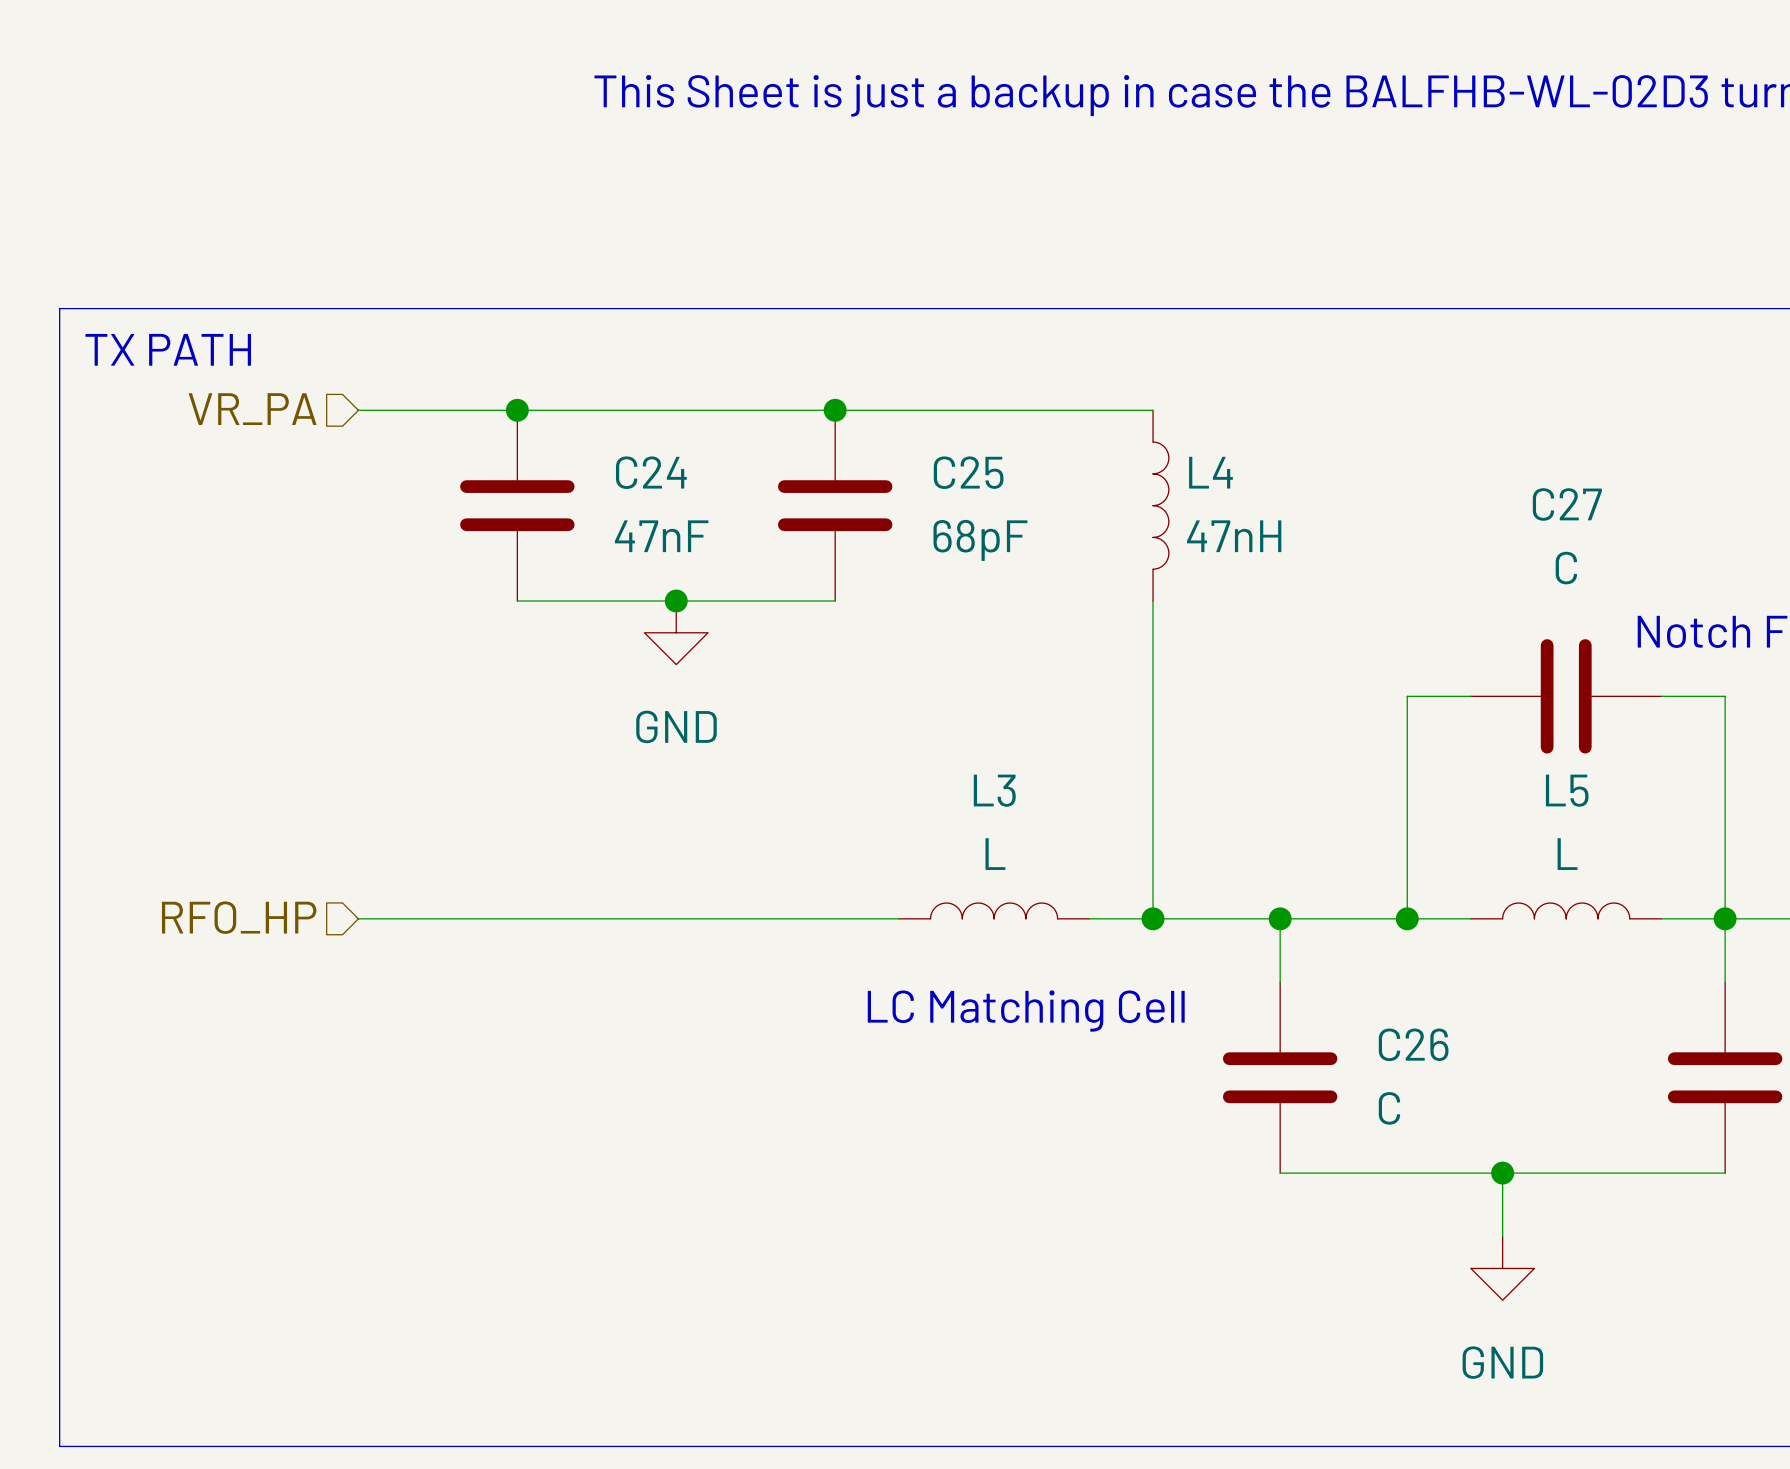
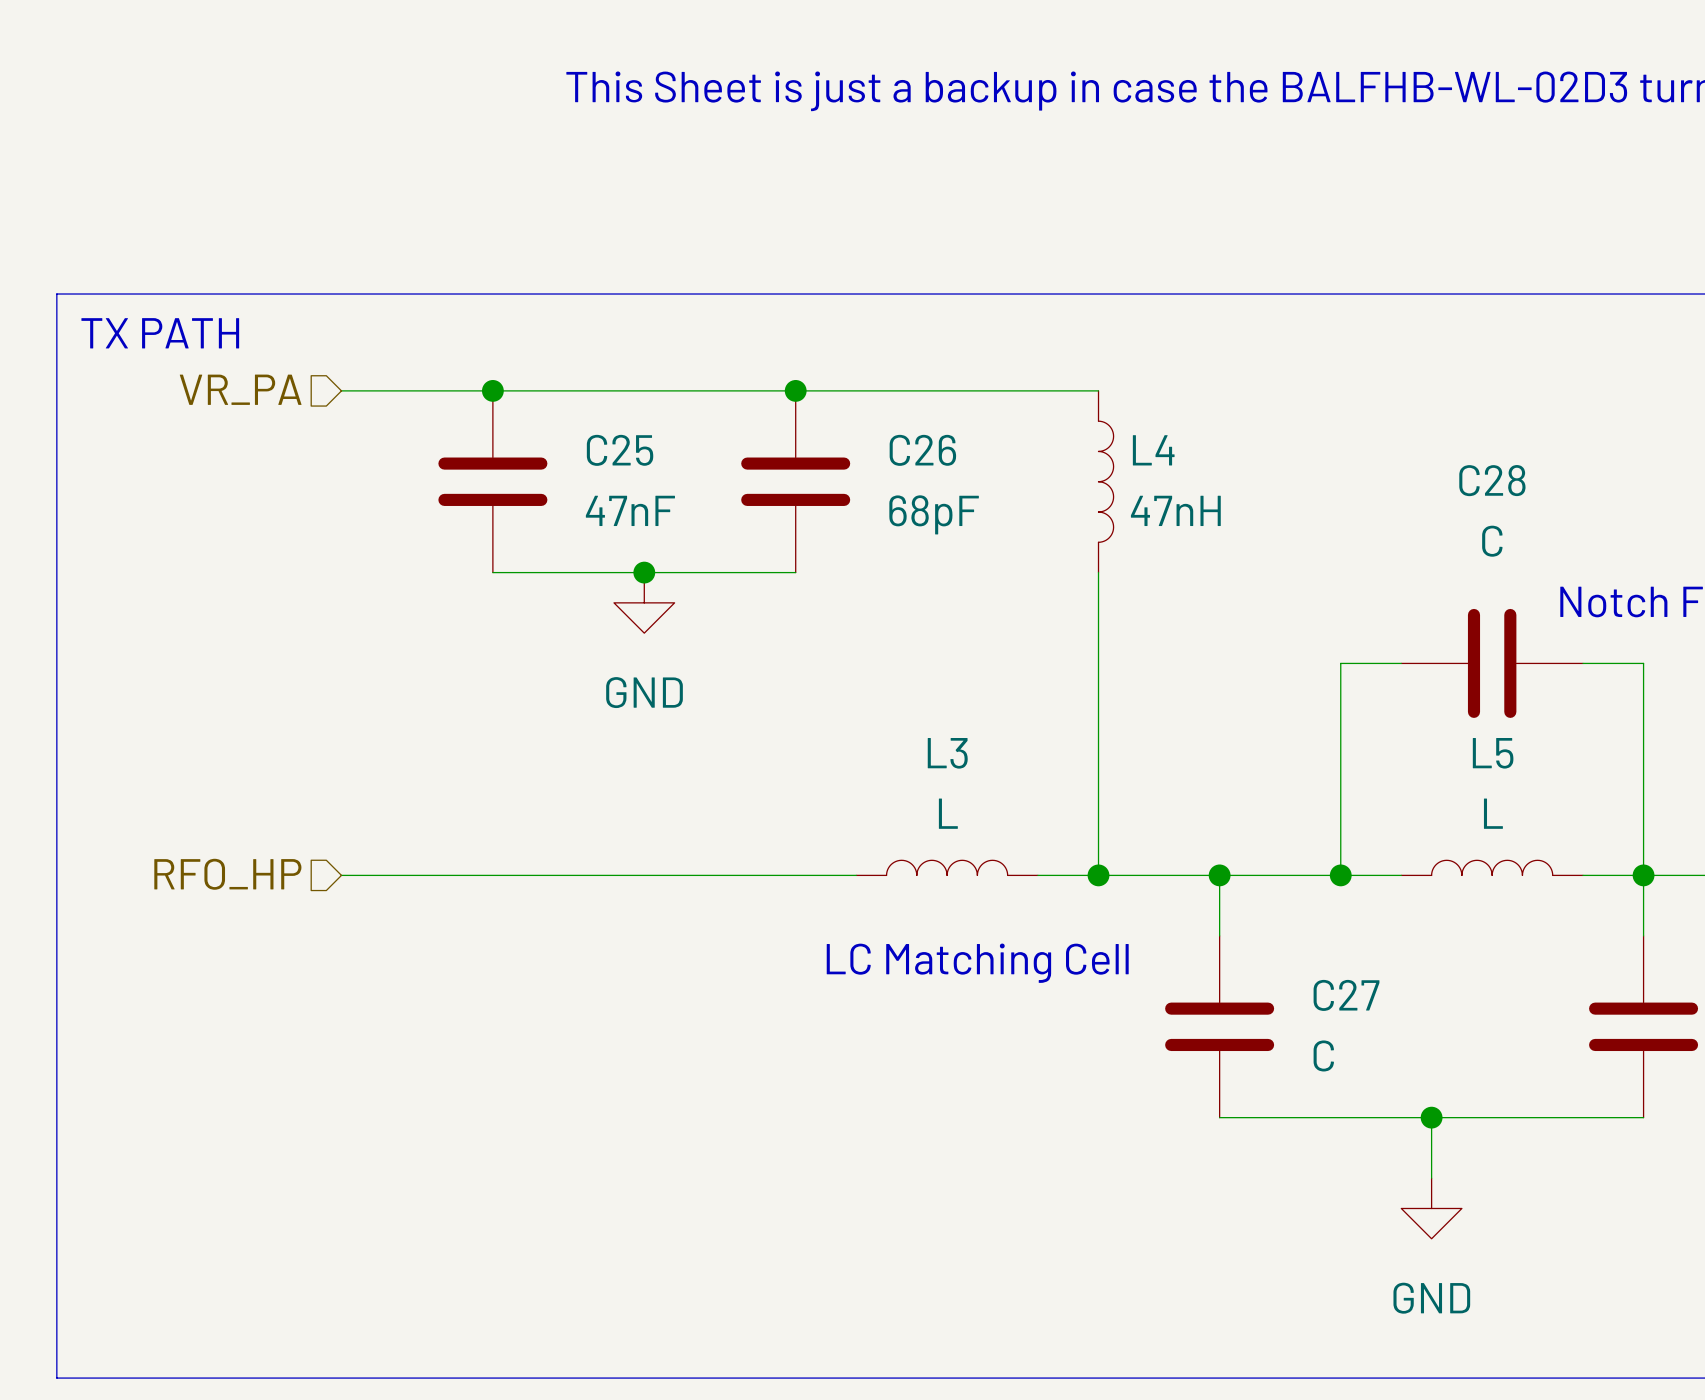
C24 name: C24 (651, 472) -> C25 (620, 450)
C25 name: C25 (968, 472) -> C26 (922, 450)
C27 name: C27 (1567, 504) -> C28 (1492, 480)
C26 name: C26 (1413, 1044) -> C27 (1346, 995)

